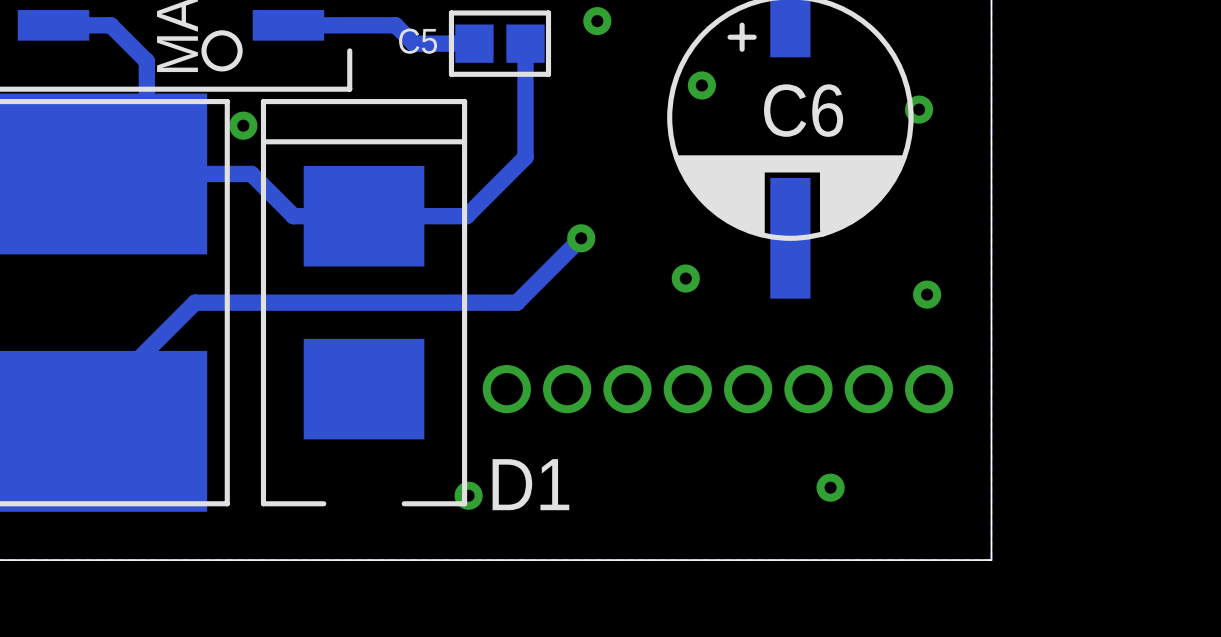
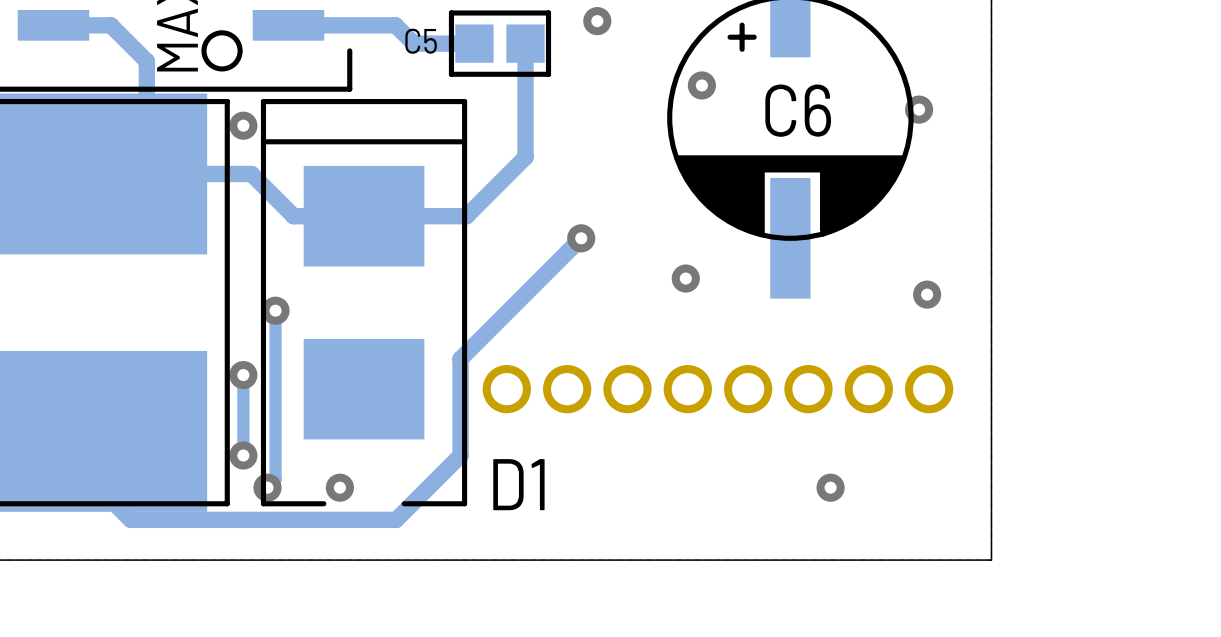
track: (516, 302) (195, 302) (66, 431) -> (516, 302) (460, 358) (460, 455) (396, 519) (130, 519) (42, 431)
track: none -> (275, 310) (275, 479) (267, 487)
via: none -> (275, 310)
track: none -> (243, 375) (243, 455)
via: none -> (243, 375)
via: none -> (243, 455)
via: none -> (267, 487)
via: none -> (339, 487)
via: (468, 495) -> none

